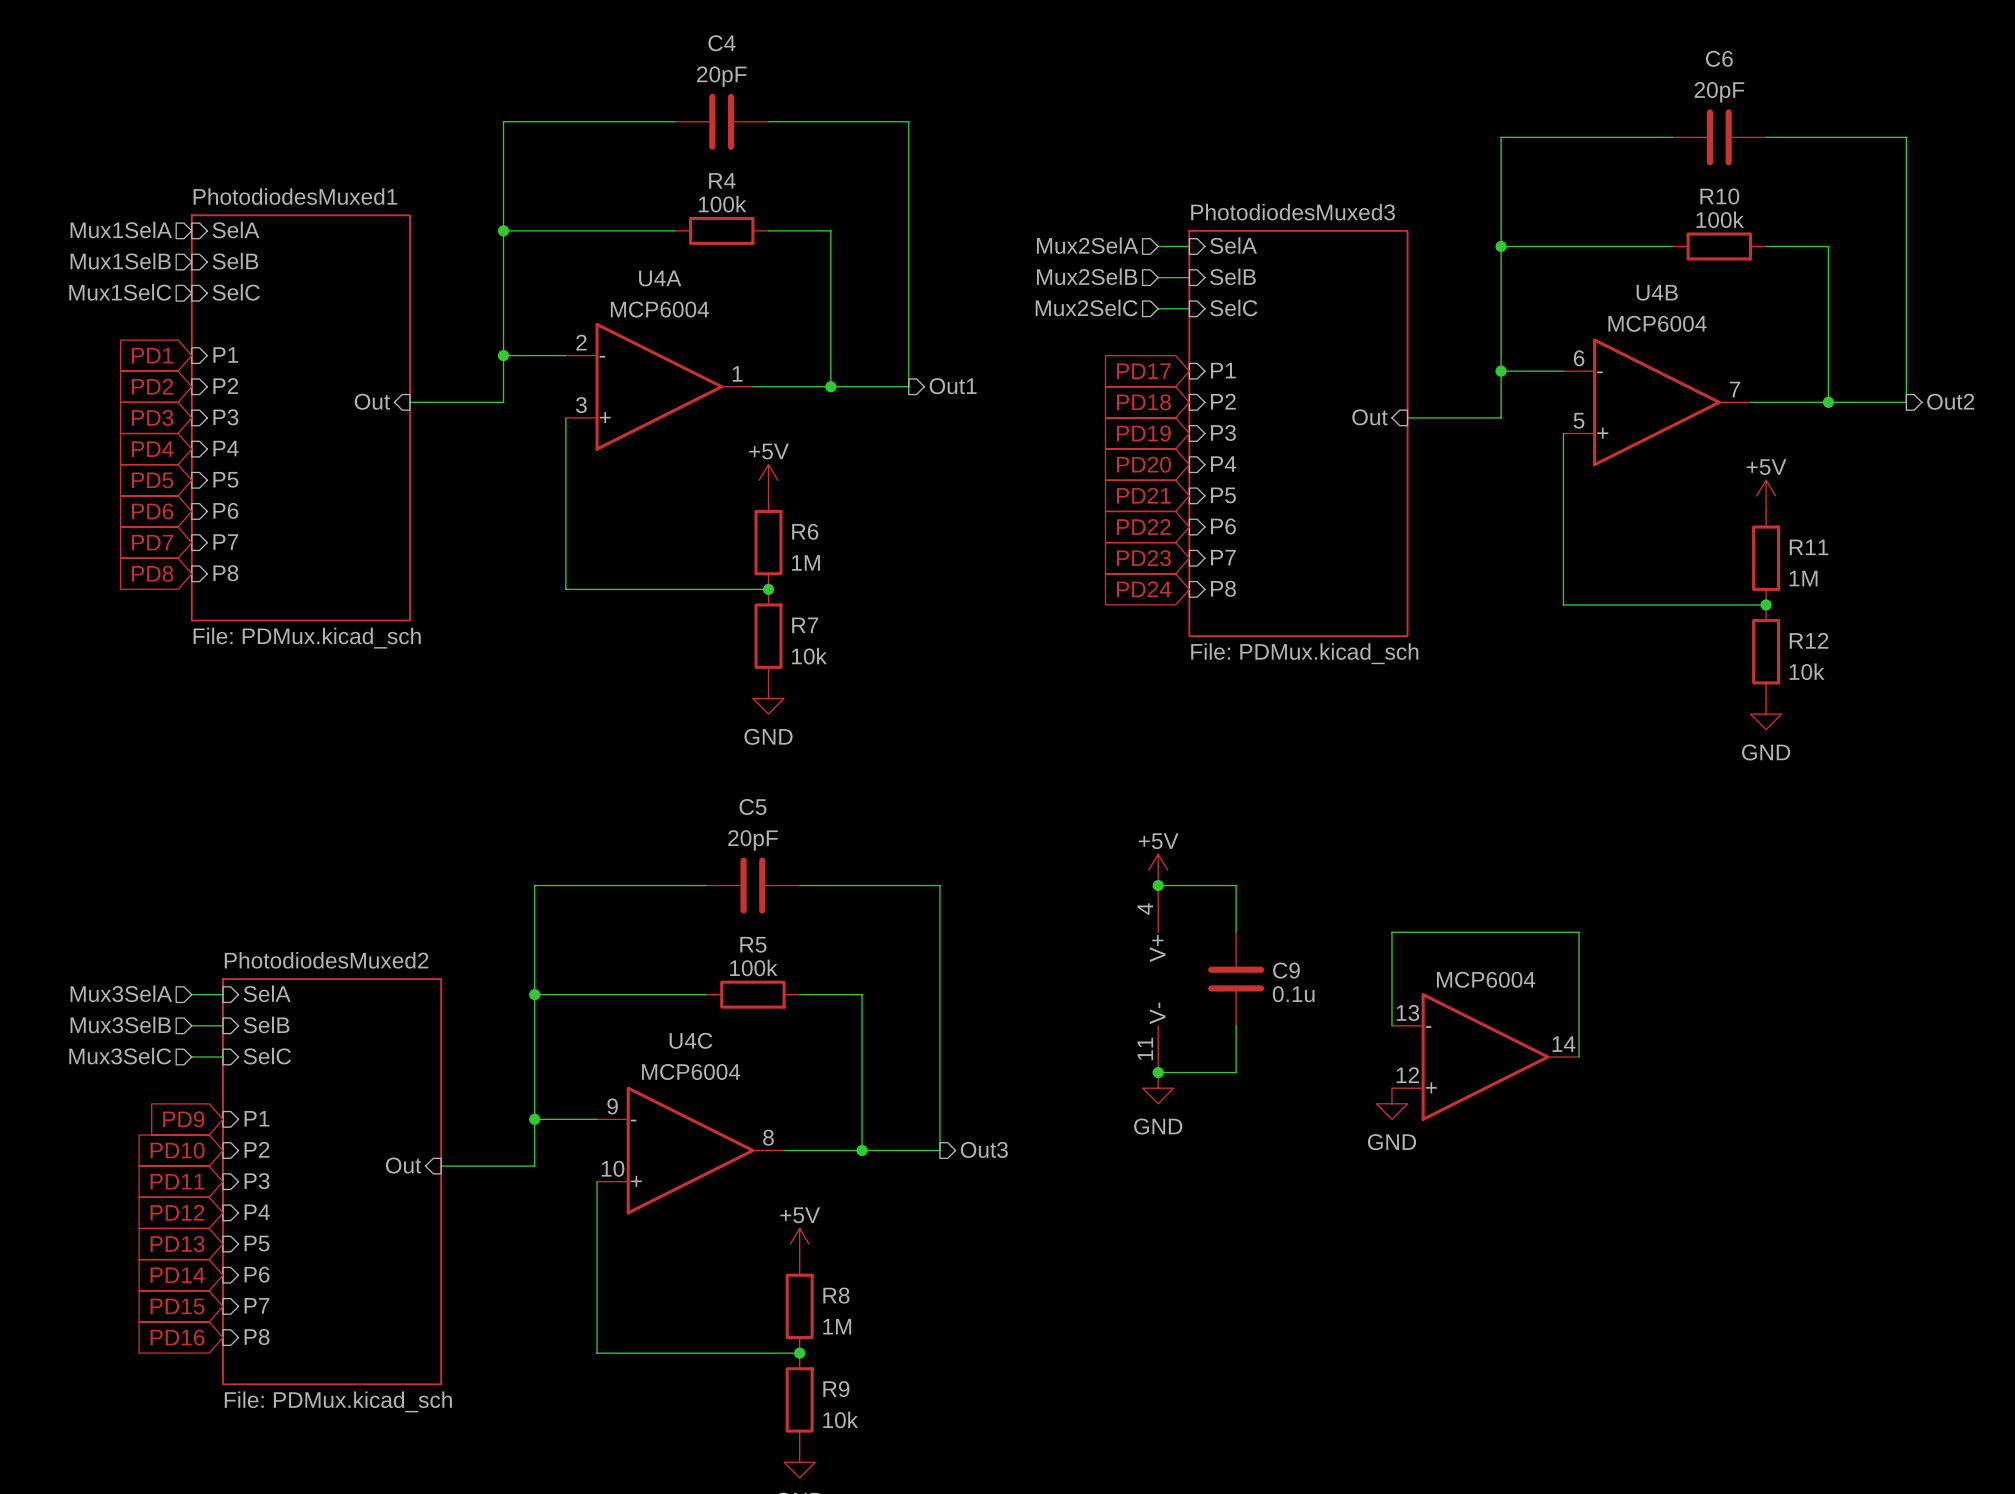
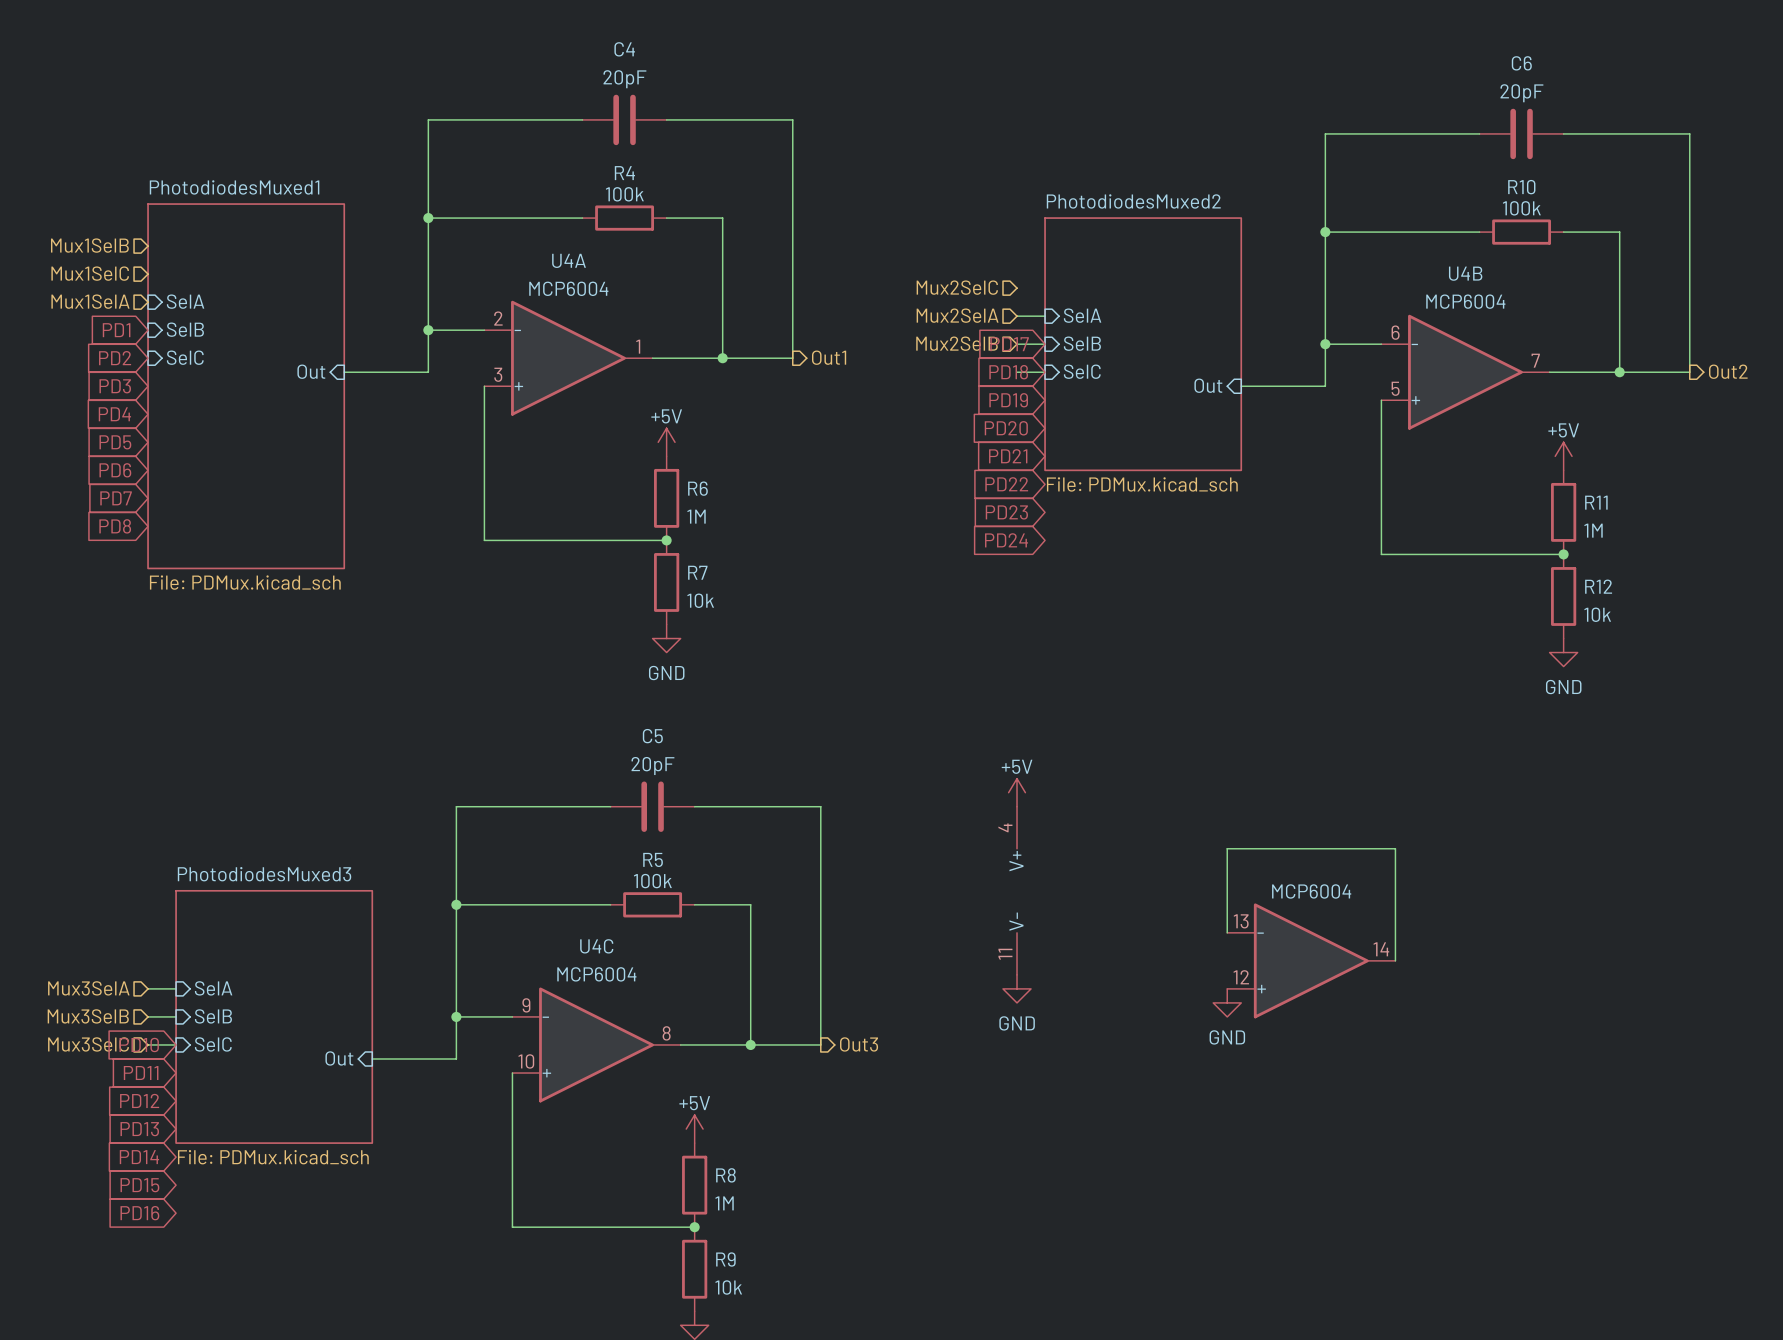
sheet PhotodiodesMuxed3 name position: PhotodiodesMuxed3 (1293, 212) -> PhotodiodesMuxed3 (264, 874)
sheet PhotodiodesMuxed3 shape: [1188, 229, 1409, 638] -> [175, 889, 374, 1144]
hierarchical label position: Mux1SelA (121, 230) -> Mux1SelA (90, 301)
sheet pin position: SelA (235, 230) -> SelA (185, 301)
hierarchical label position: Mux2SelA (1087, 245) -> Mux2SelA (957, 315)
sheet pin position: SelA (1233, 245) -> SelA (1082, 315)
wire: (1158, 246) (1189, 246) -> (1017, 316) (1045, 316)
sheet pin: SelB (235, 261) -> none
hierarchical label position: Mux2SelB (1087, 276) -> Mux2SelB (957, 343)
sheet pin: SelB (1232, 276) -> none
wire: (1158, 277) (1189, 277) -> (1017, 344) (1045, 344)
sheet pin: SelC (236, 292) -> none
sheet pin: SelC (1233, 307) -> none
wire: (1158, 308) (1189, 308) -> (1017, 372) (1045, 372)
sheet pin: P1 (225, 355) -> SelB (185, 329)
sheet pin: P1 (1223, 370) -> SelB (1082, 343)
sheet pin: P2 (225, 386) -> SelC (185, 357)
sheet pin: P2 (1223, 401) -> SelC (1082, 371)
sheet pin: P3 (225, 417) -> none
sheet pin: P3 (1223, 432) -> none
sheet pin: P4 (226, 448) -> none
sheet pin: P4 (1223, 464) -> none
sheet pin: P5 (225, 479) -> none
sheet pin: P5 (1223, 495) -> none
sheet pin: P6 (225, 510) -> none
sheet pin: P6 (1223, 526) -> none
sheet pin: P7 (225, 542) -> none
sheet pin: P7 (1223, 557) -> none
sheet pin: P8 (225, 573) -> none
sheet pin: P8 (1223, 588) -> none
sheet PhotodiodesMuxed3 value position: File: PDMux.kicad_sch (1304, 653) -> File: PDMux.kicad_sch (273, 1157)
wire: (1158, 885) (1236, 885) (1236, 932) -> none
junction: (1158, 885) -> none
sheet PhotodiodesMuxed2 name position: PhotodiodesMuxed2 (326, 960) -> PhotodiodesMuxed2 (1133, 201)
sheet PhotodiodesMuxed2 shape: [222, 978, 443, 1386] -> [1044, 217, 1243, 472]
C9: 0.1u (1236, 979) -> none
hierarchical label position: Mux3SelA (121, 993) -> Mux3SelA (88, 988)
sheet pin position: SelA (267, 993) -> SelA (213, 988)
wire: (191, 994) (222, 994) -> (148, 988) (176, 988)
hierarchical label position: Mux3SelB (120, 1024) -> Mux3SelB (88, 1016)
sheet pin: SelB (266, 1024) -> none
wire: (191, 1025) (222, 1025) -> (148, 1016) (176, 1016)
wire: (1236, 1025) (1236, 1072) (1158, 1072) -> none
hierarchical label position: Mux3SelC (120, 1056) -> Mux3SelC (88, 1044)
sheet pin: SelC (267, 1056) -> none
wire: (191, 1057) (222, 1057) -> (148, 1044) (176, 1044)
junction: (1158, 1072) -> none
sheet pin: P1 (256, 1118) -> SelB (213, 1016)
global label: PD9 (183, 1119) -> none
sheet pin: P2 (256, 1149) -> SelC (213, 1044)
sheet pin: P3 (257, 1181) -> none
sheet pin: P4 (257, 1212) -> none
sheet pin: P5 (257, 1243) -> none
sheet pin: P6 (257, 1274) -> none
sheet pin: P7 (256, 1305) -> none
sheet pin: P8 (257, 1336) -> none
sheet PhotodiodesMuxed2 value position: File: PDMux.kicad_sch (338, 1401) -> File: PDMux.kicad_sch (1142, 484)

